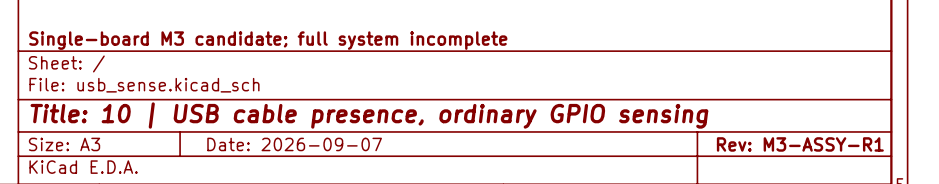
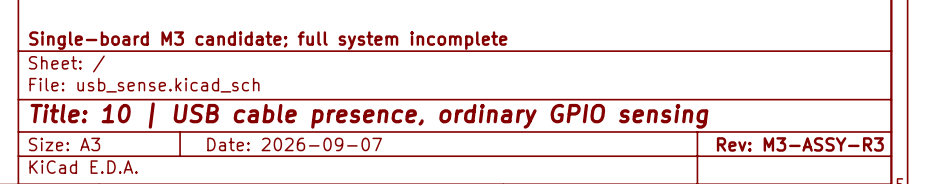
title block: Rev: M3-ASSY-R1 (800, 144) -> Rev: M3-ASSY-R3 (800, 144)

